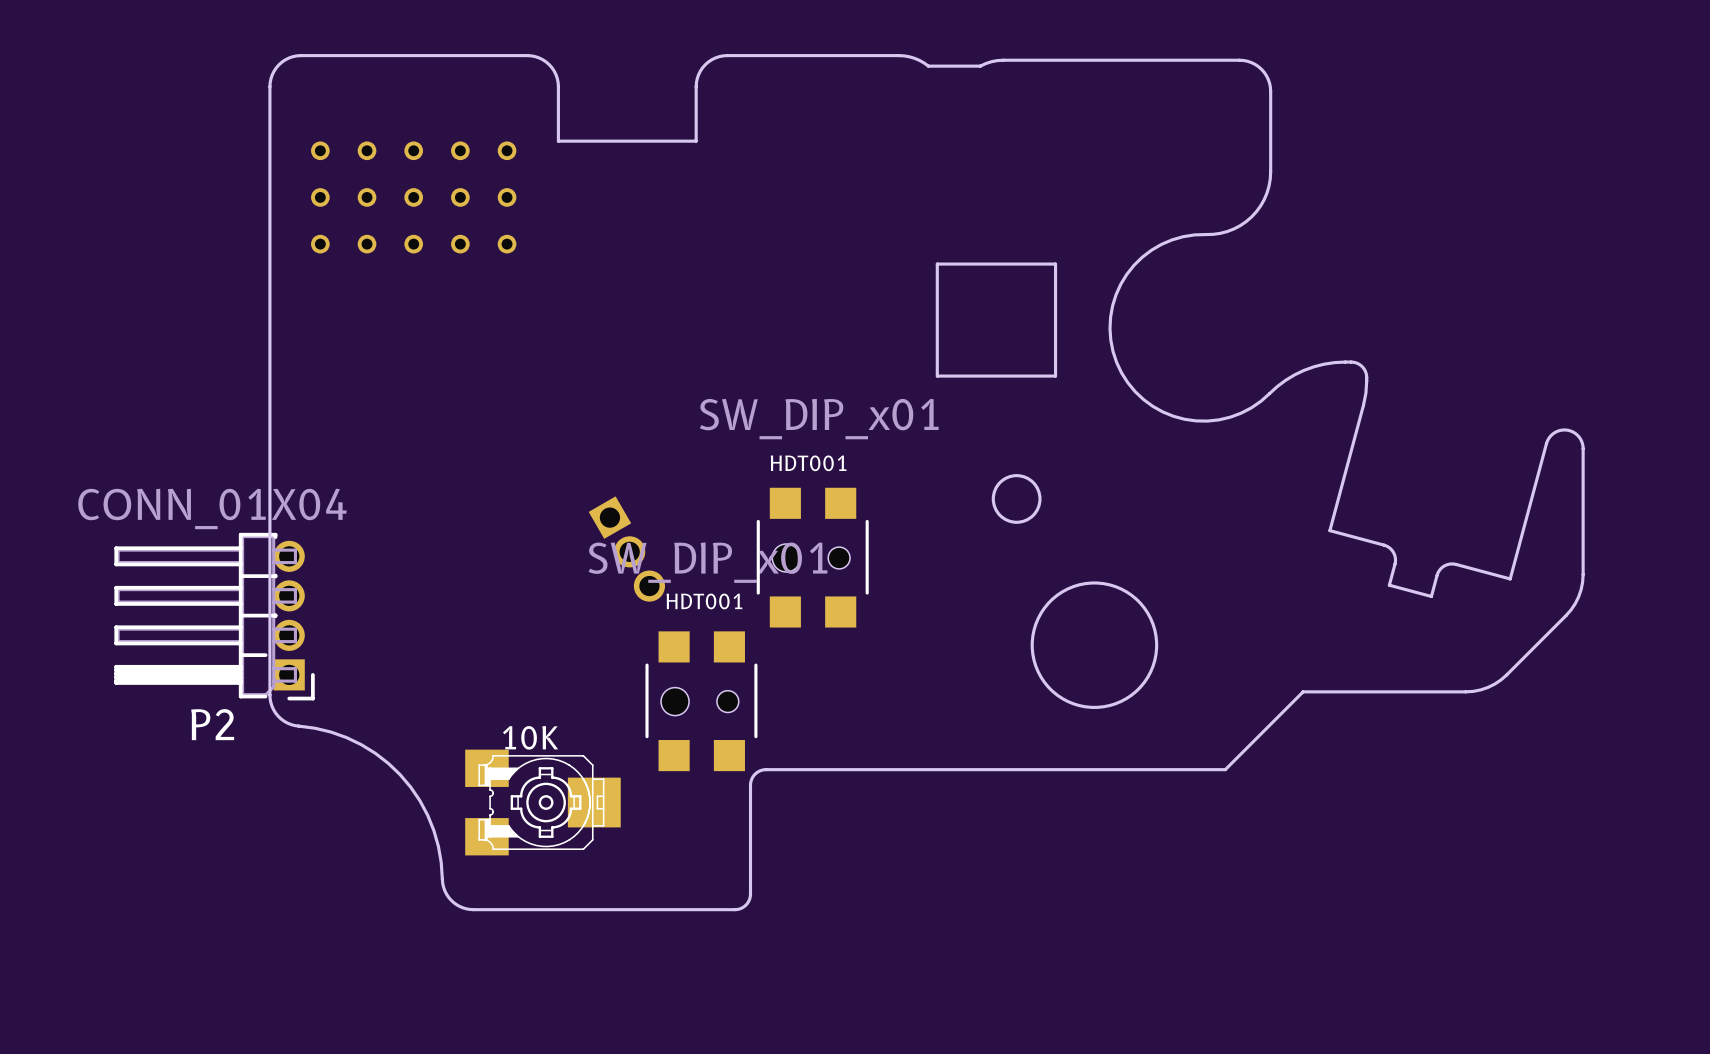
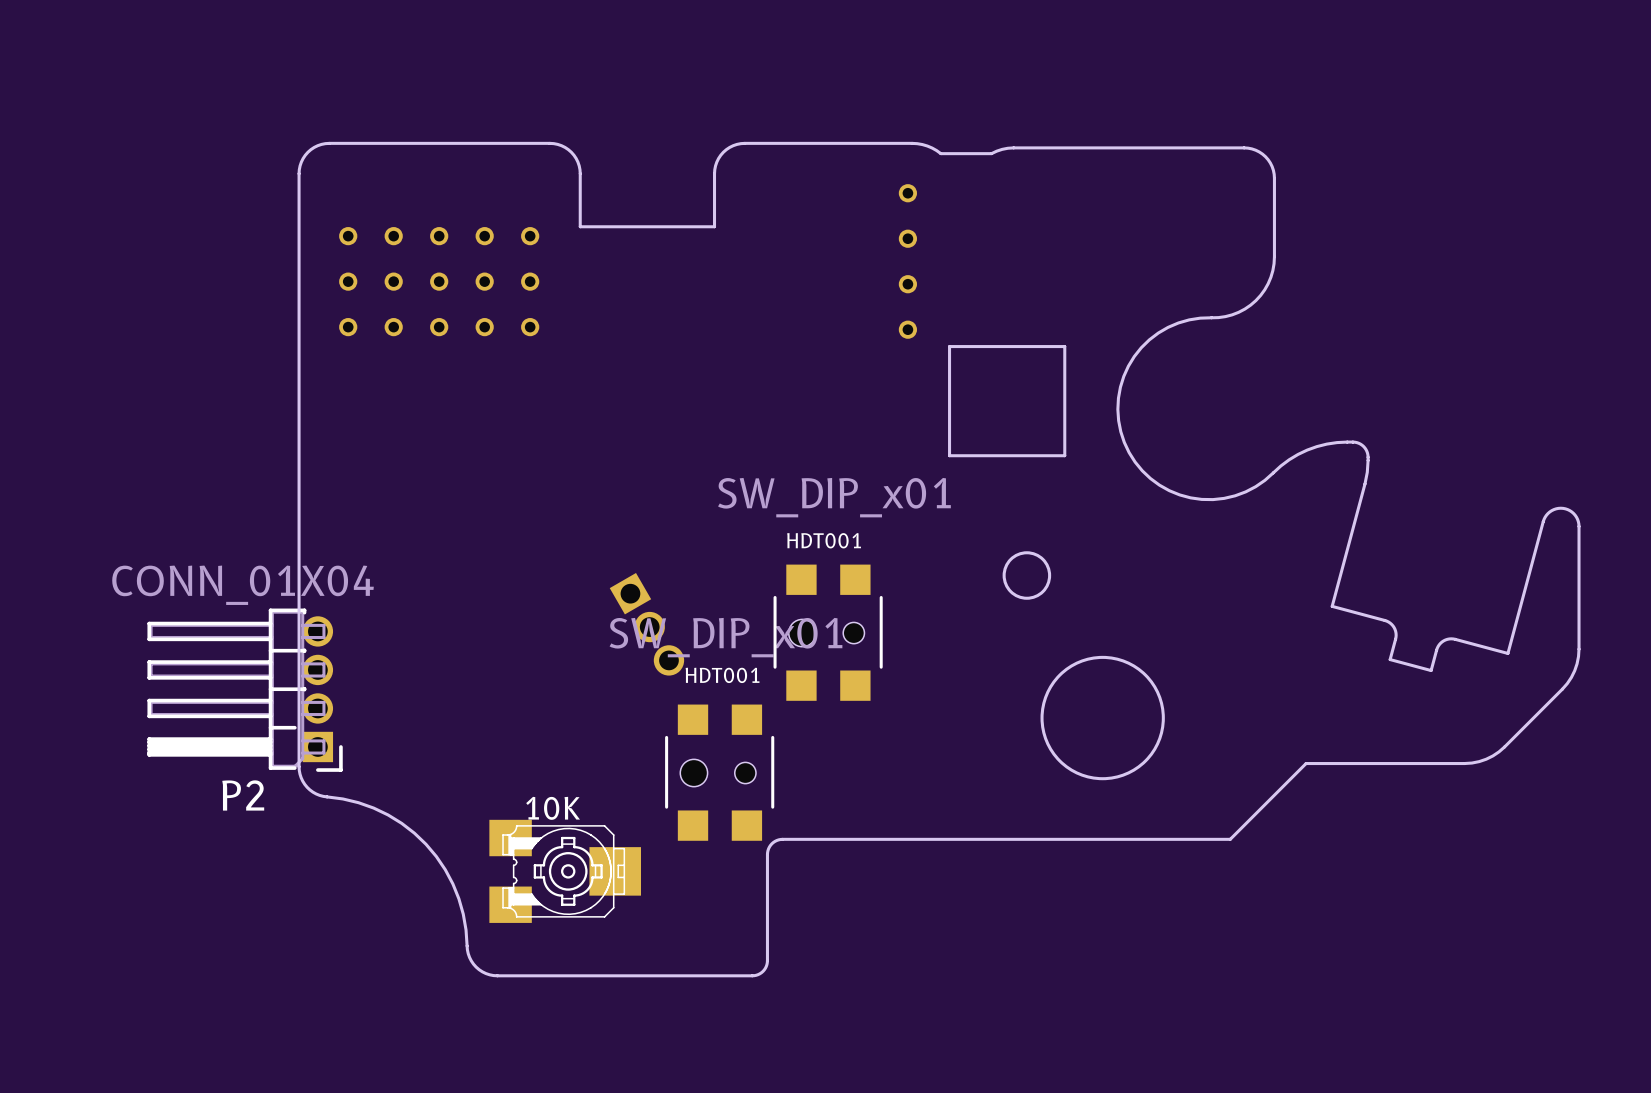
part: none -> (907, 193)
part: none -> (907, 238)
part: none -> (907, 284)
part: none -> (907, 329)

